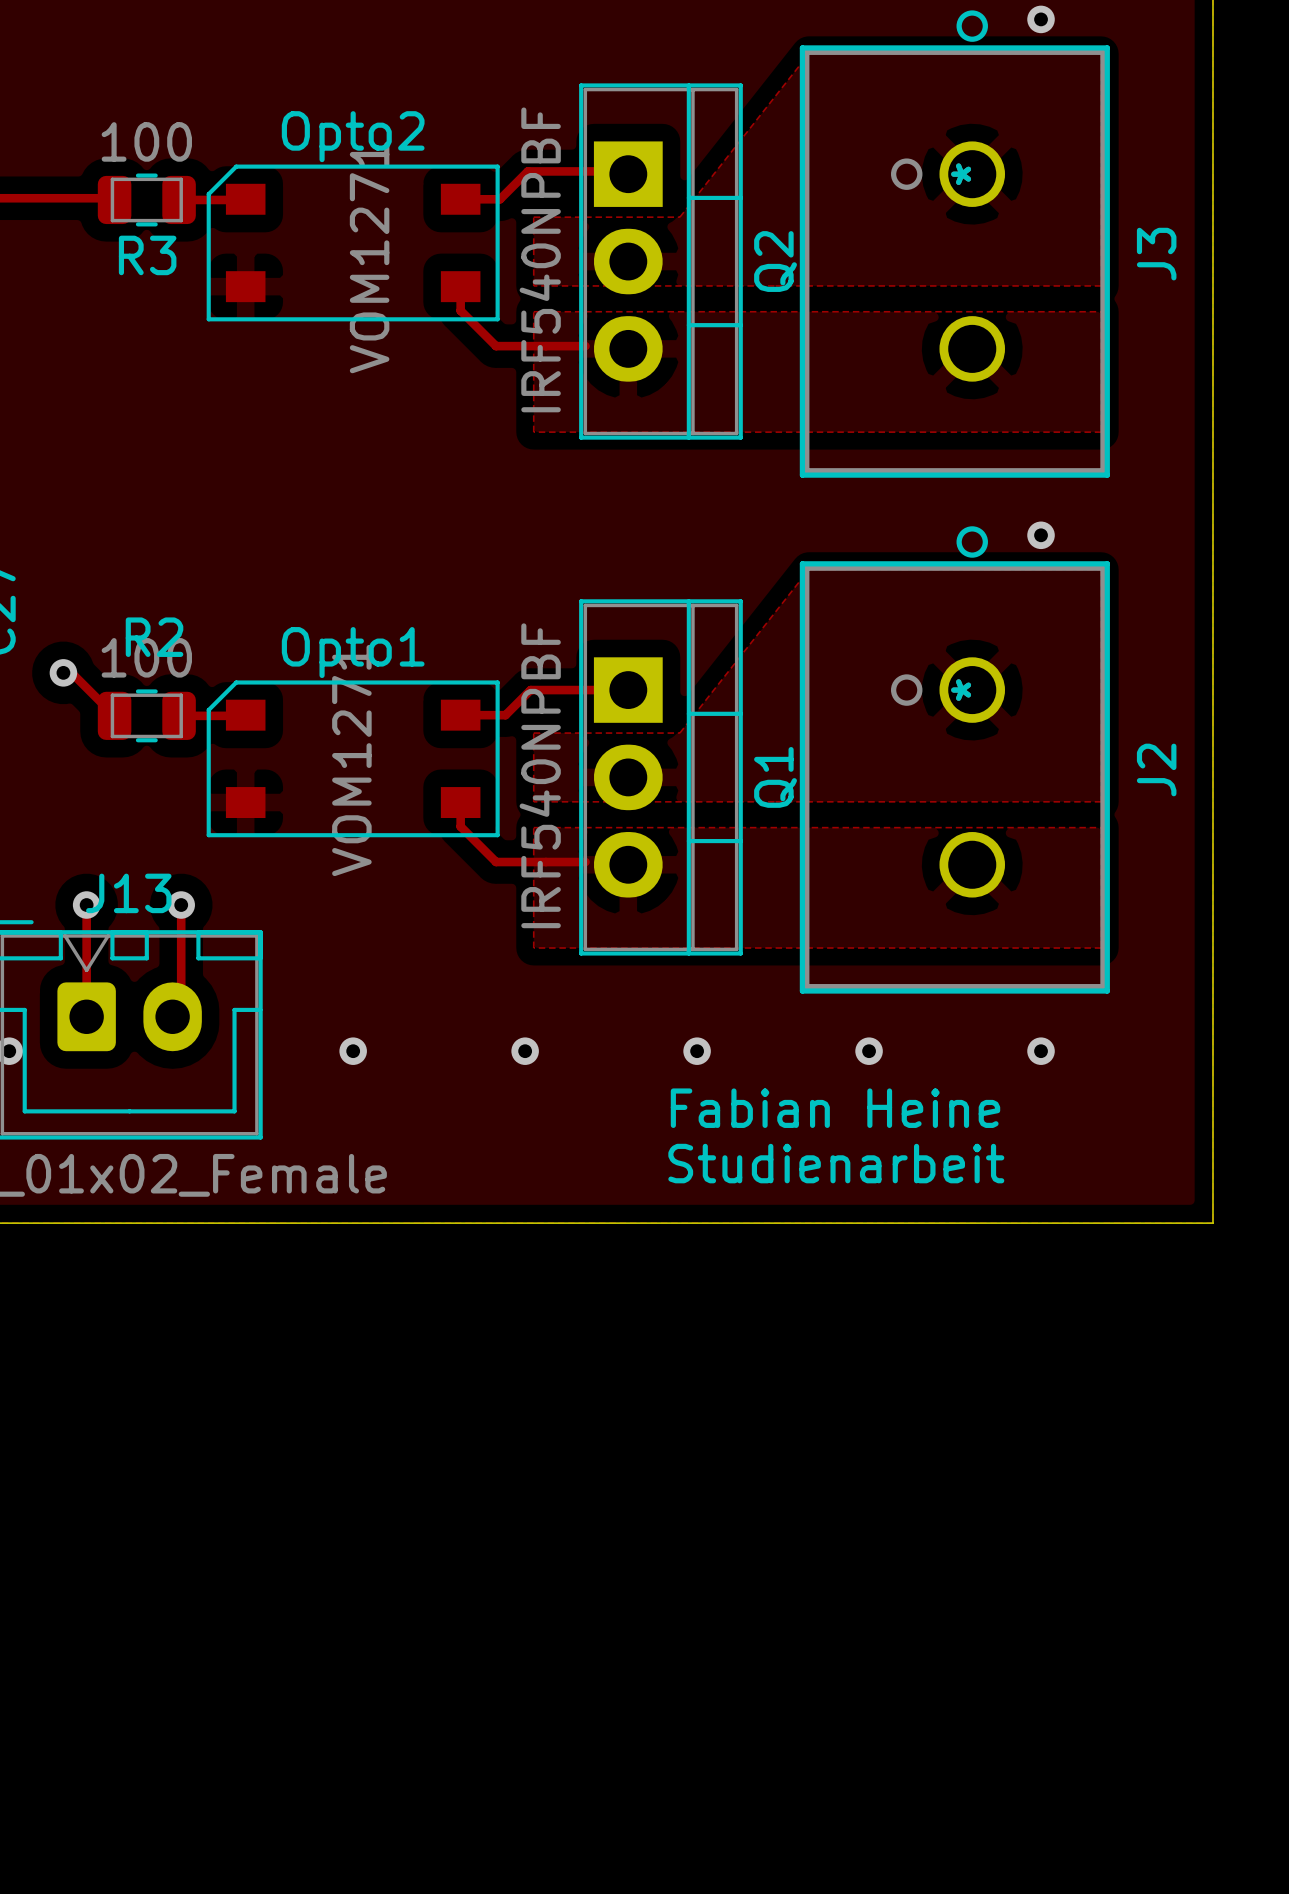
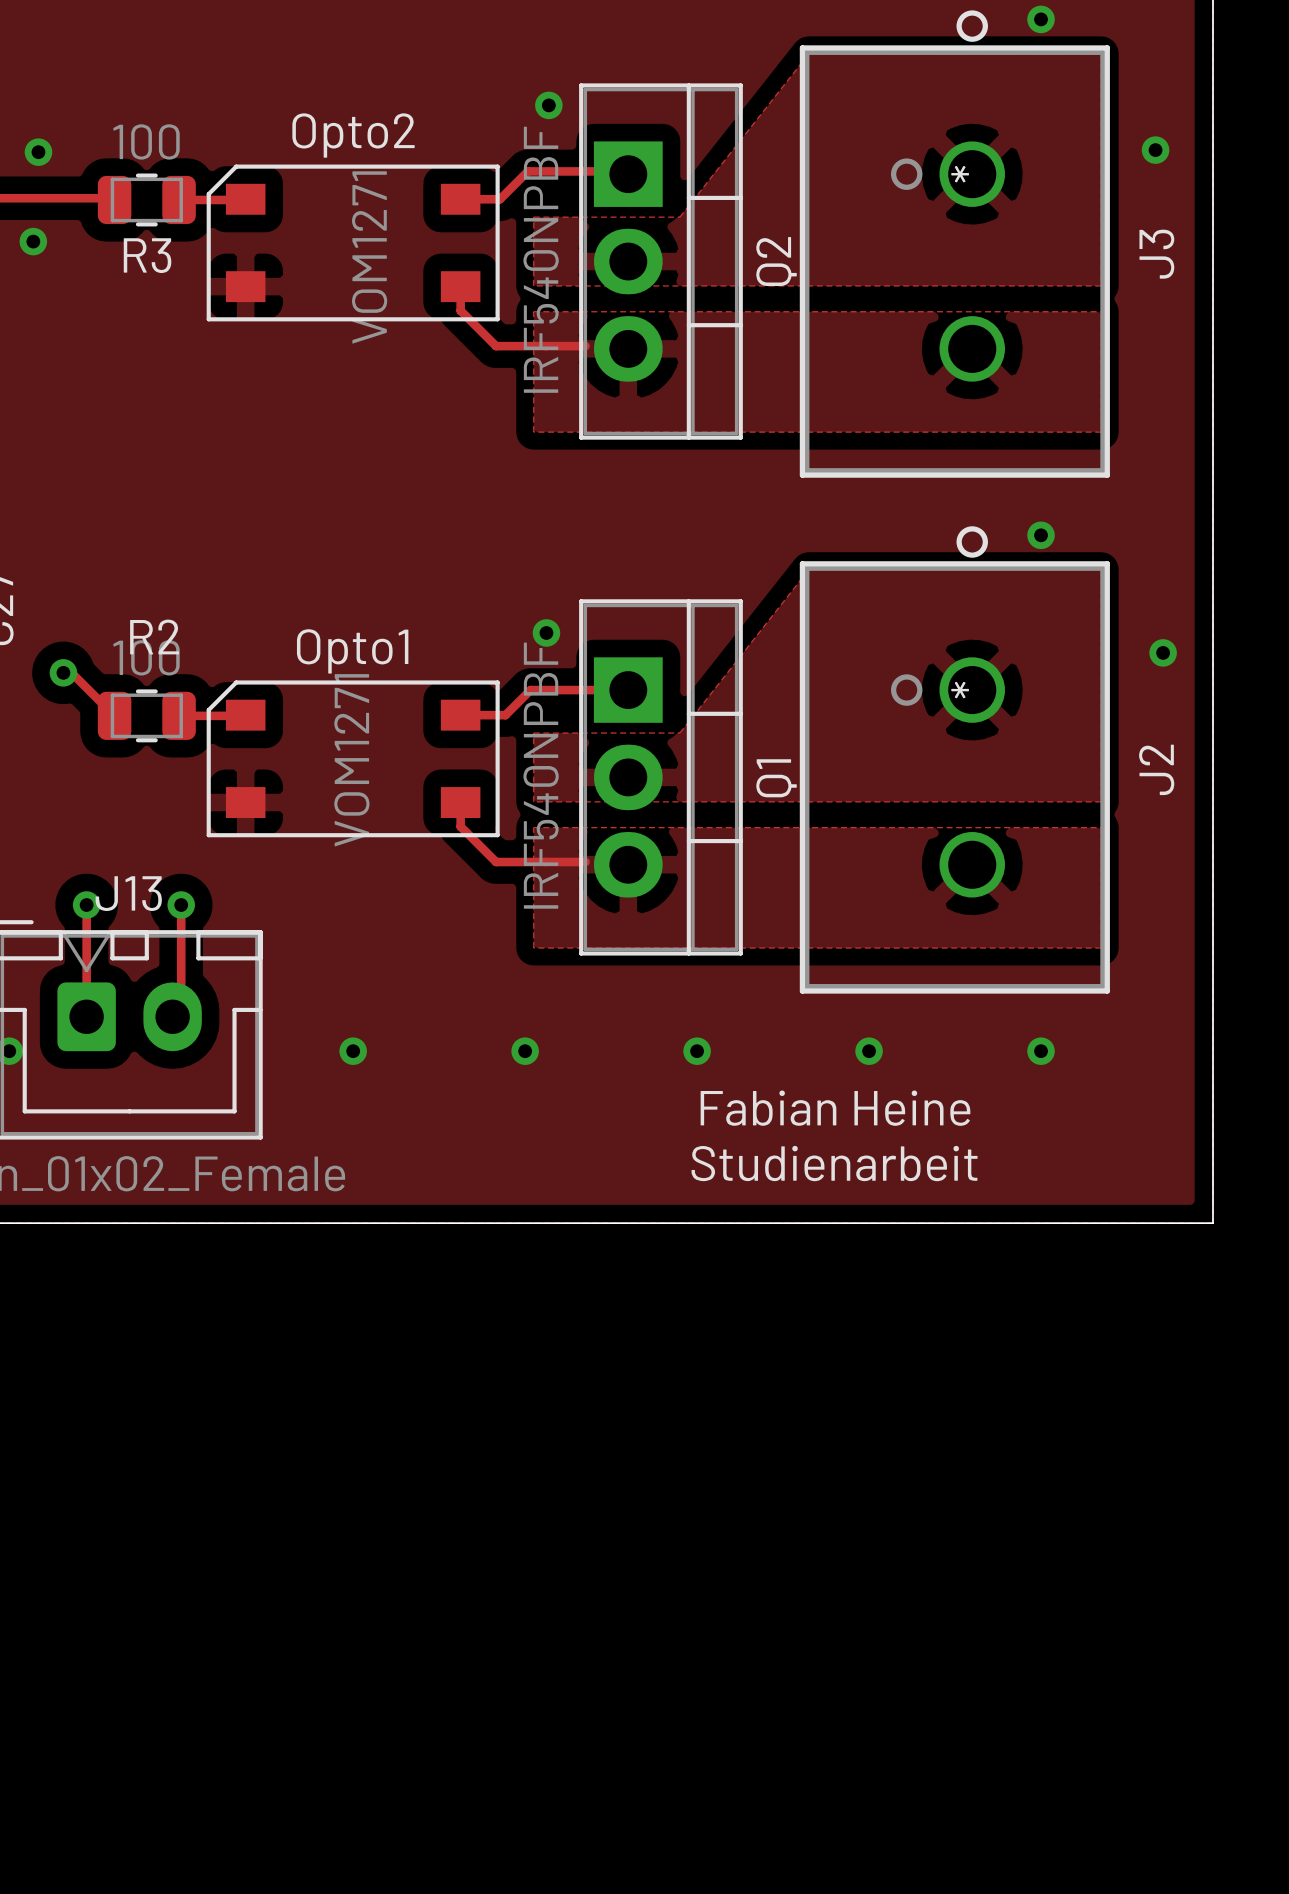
via: none -> (548, 105)
via: none -> (1155, 150)
via: none -> (38, 152)
via: none -> (33, 241)
via: none -> (546, 632)
via: none -> (1163, 652)

